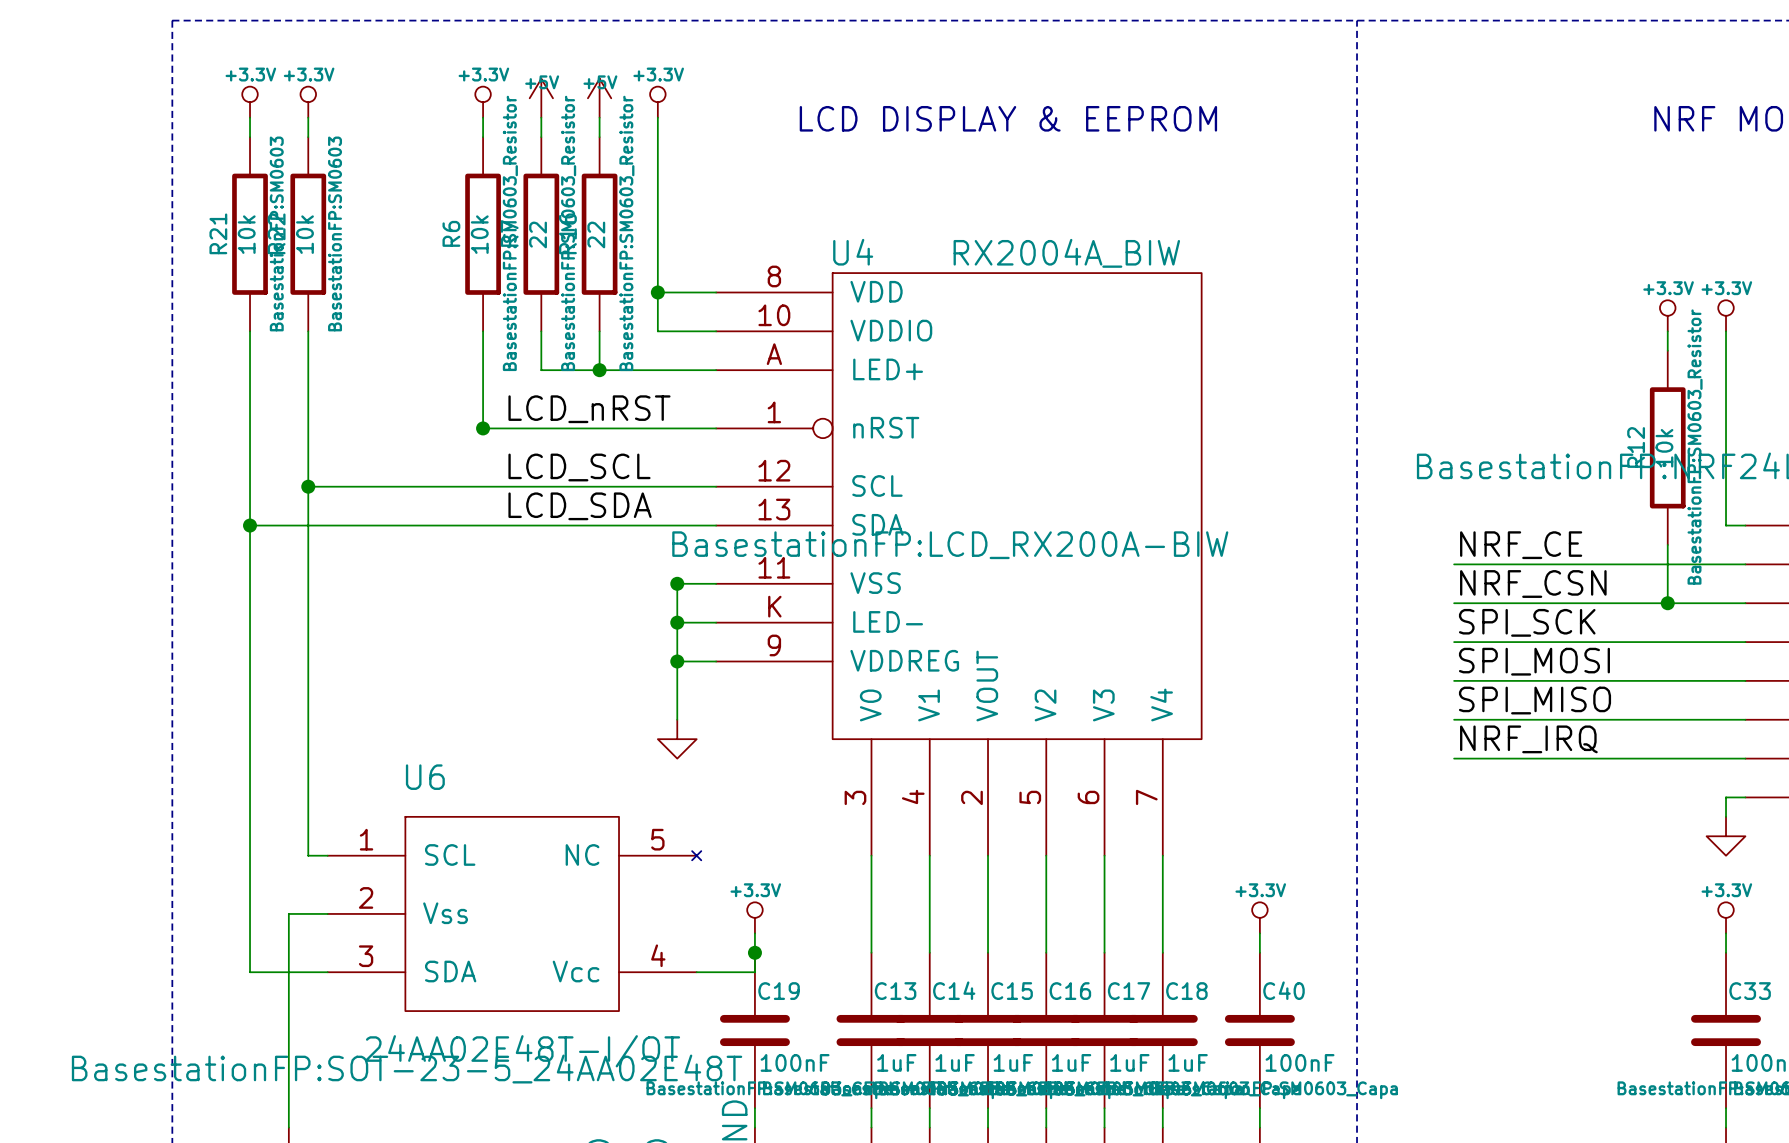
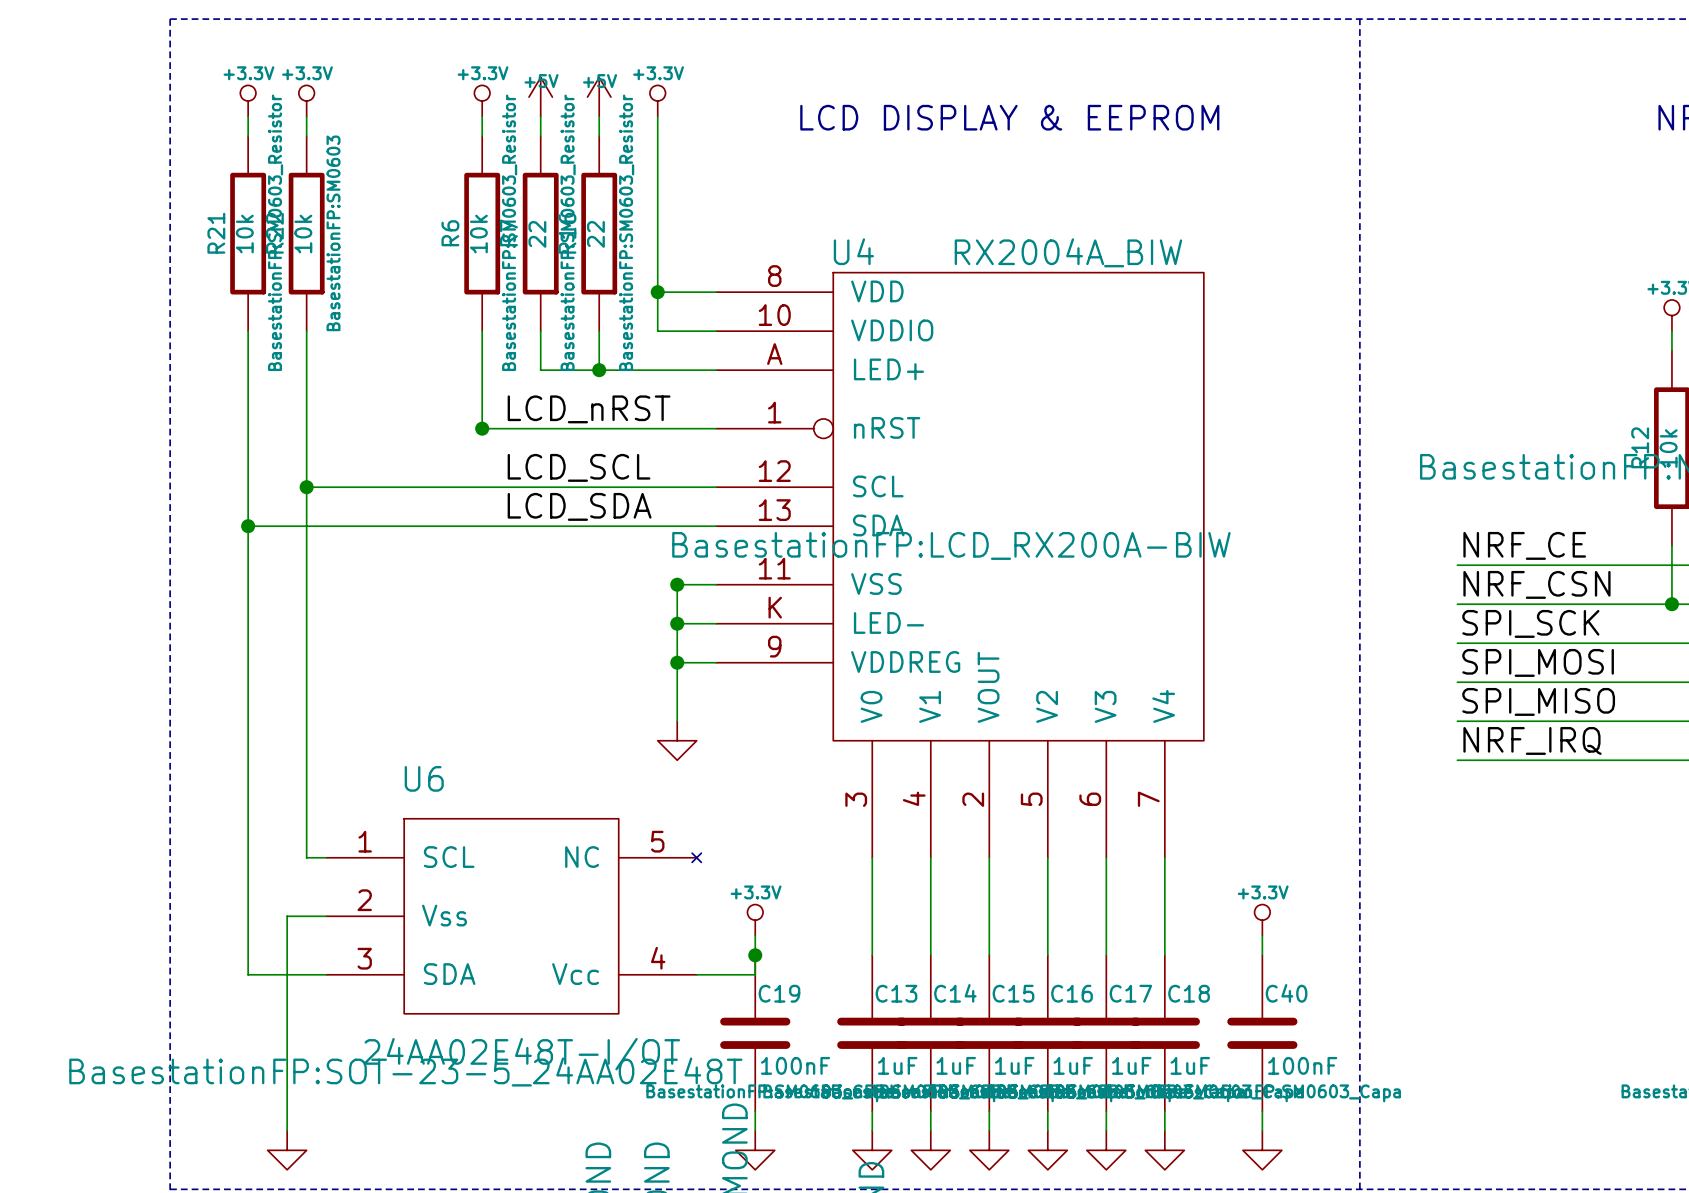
R21 text: BasestationFP:SM0603 (276, 233) -> BasestationFP:SM0603_Resistor (275, 232)

